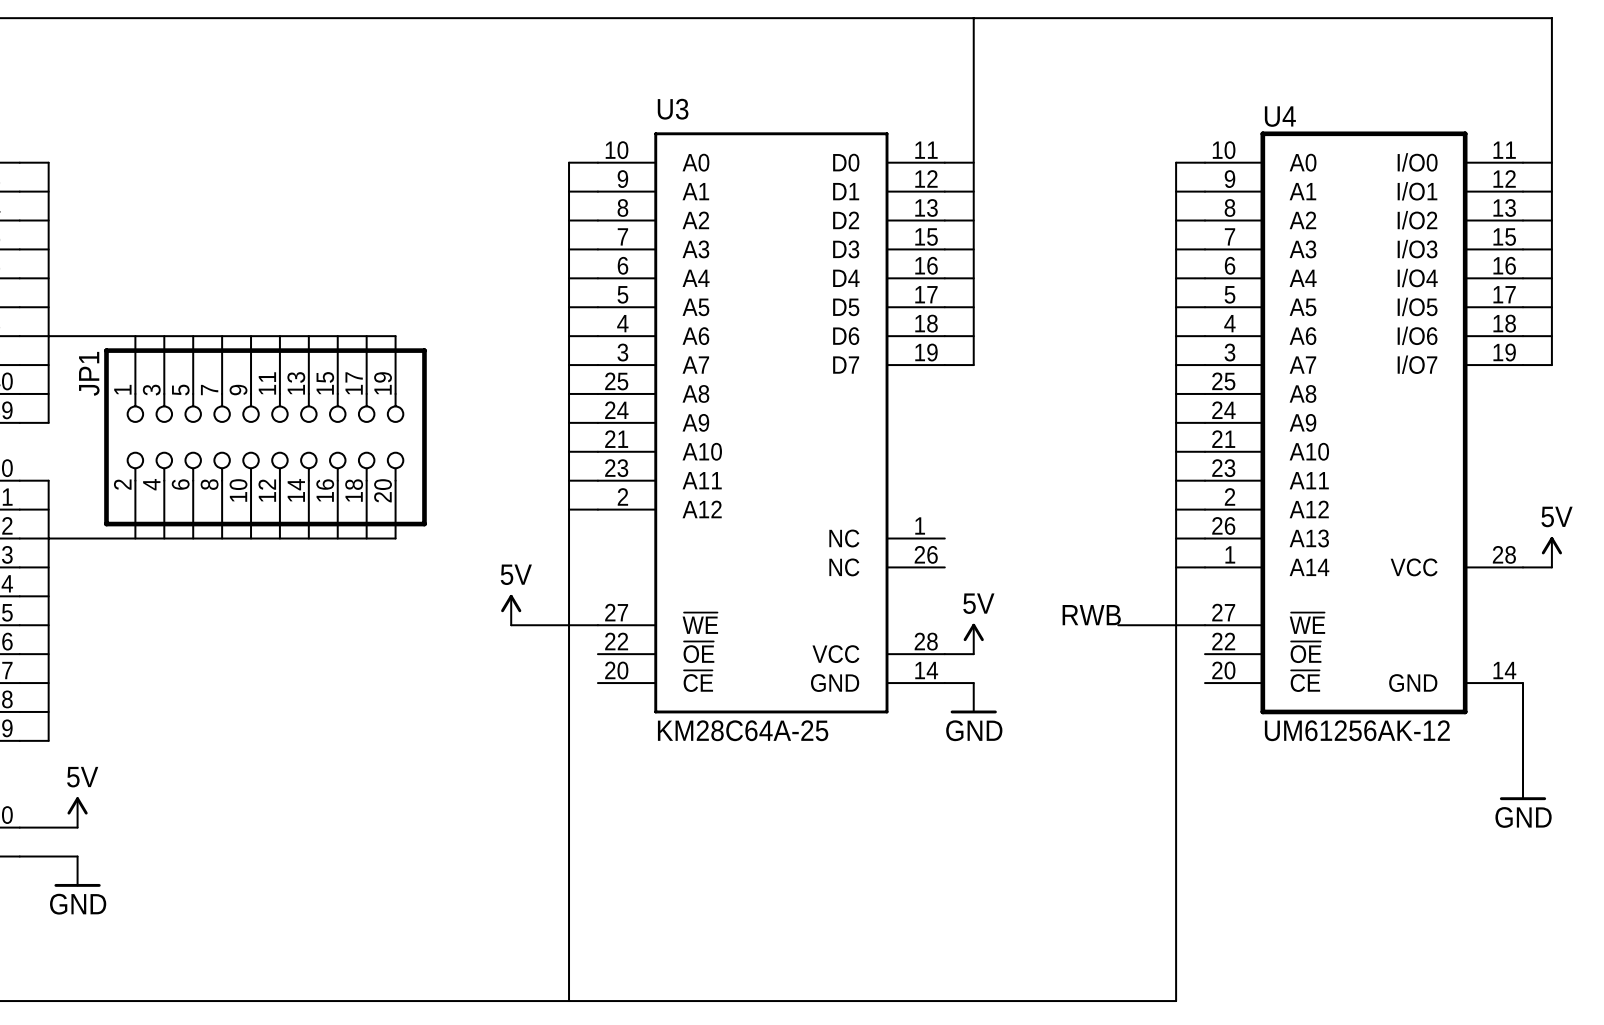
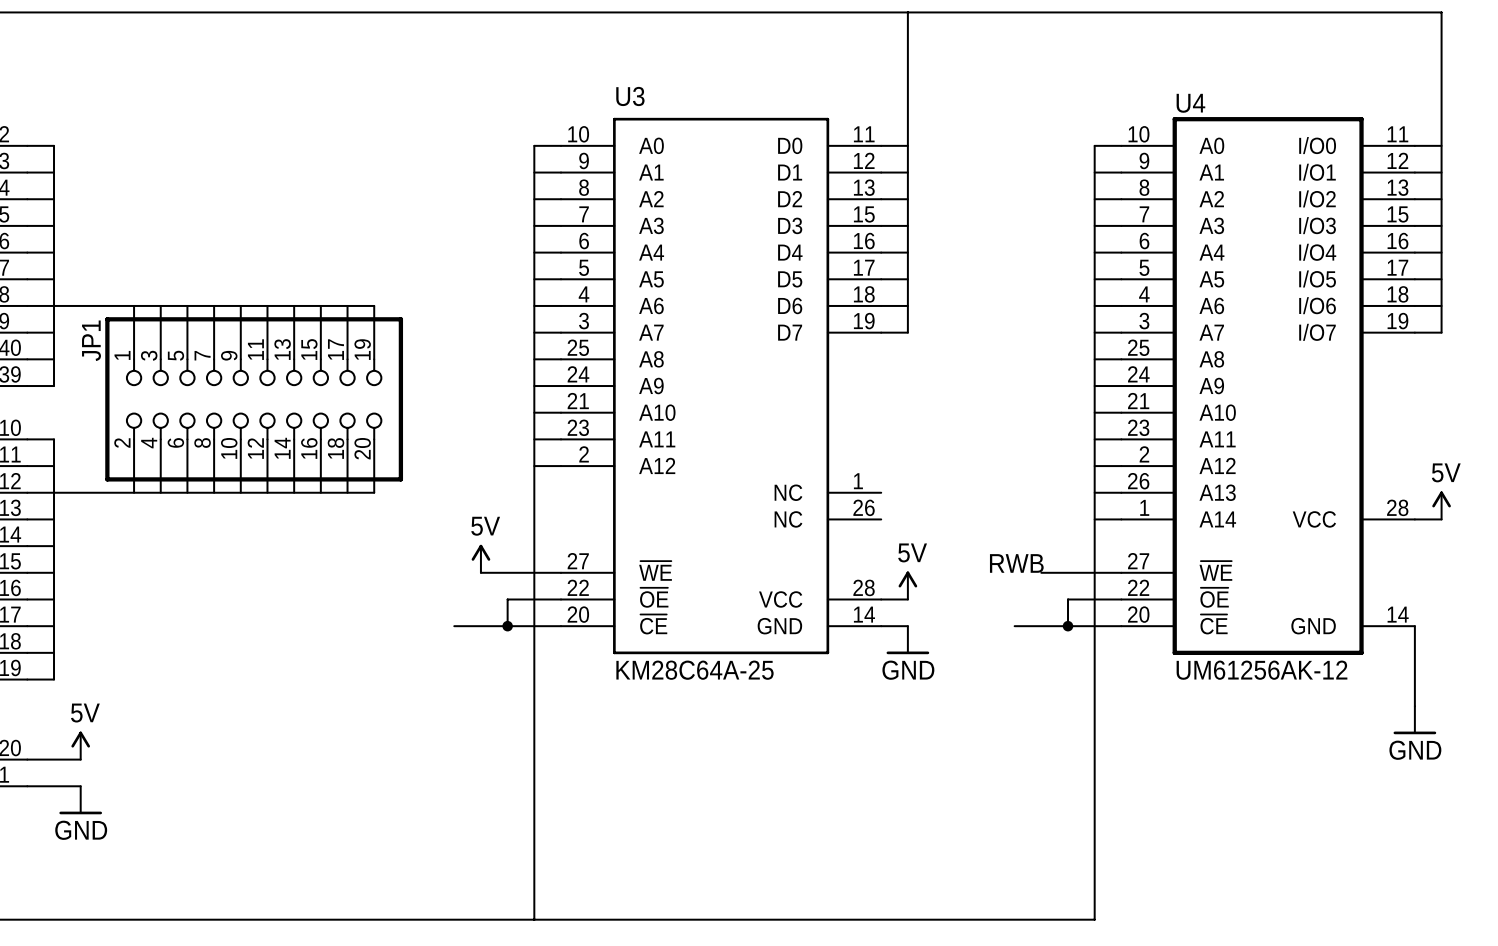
wire: none -> (561, 599) (507, 599) (507, 626)
wire: none -> (1121, 599) (1068, 599) (1068, 626)
wire: none -> (454, 626) (561, 626)
junction: none -> (507, 626)
wire: none -> (1014, 626) (1121, 626)
junction: none -> (1068, 626)

